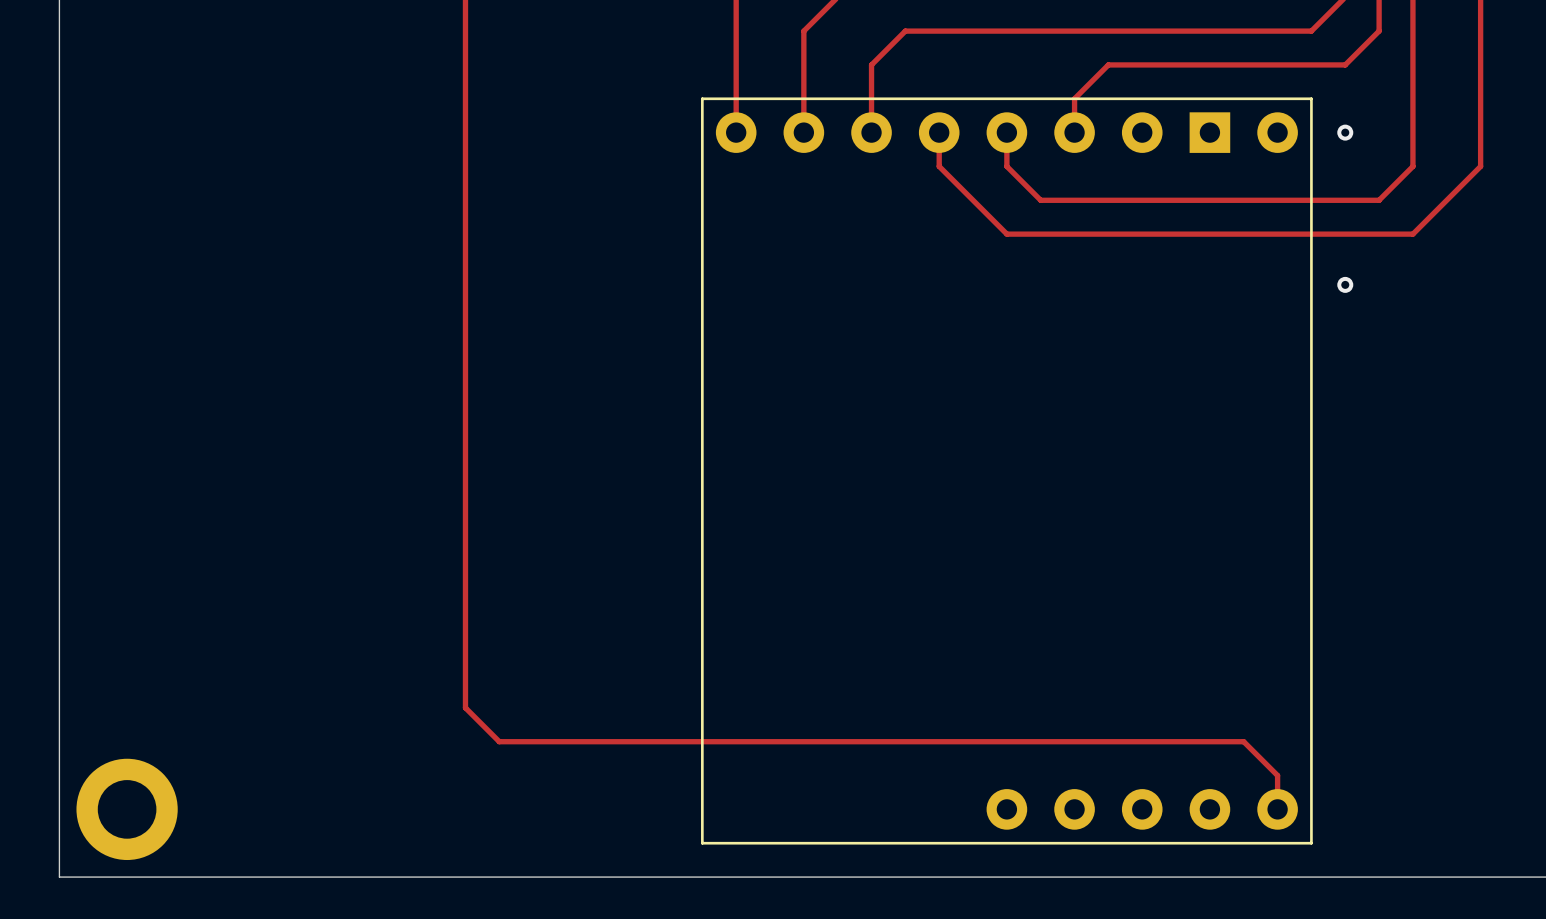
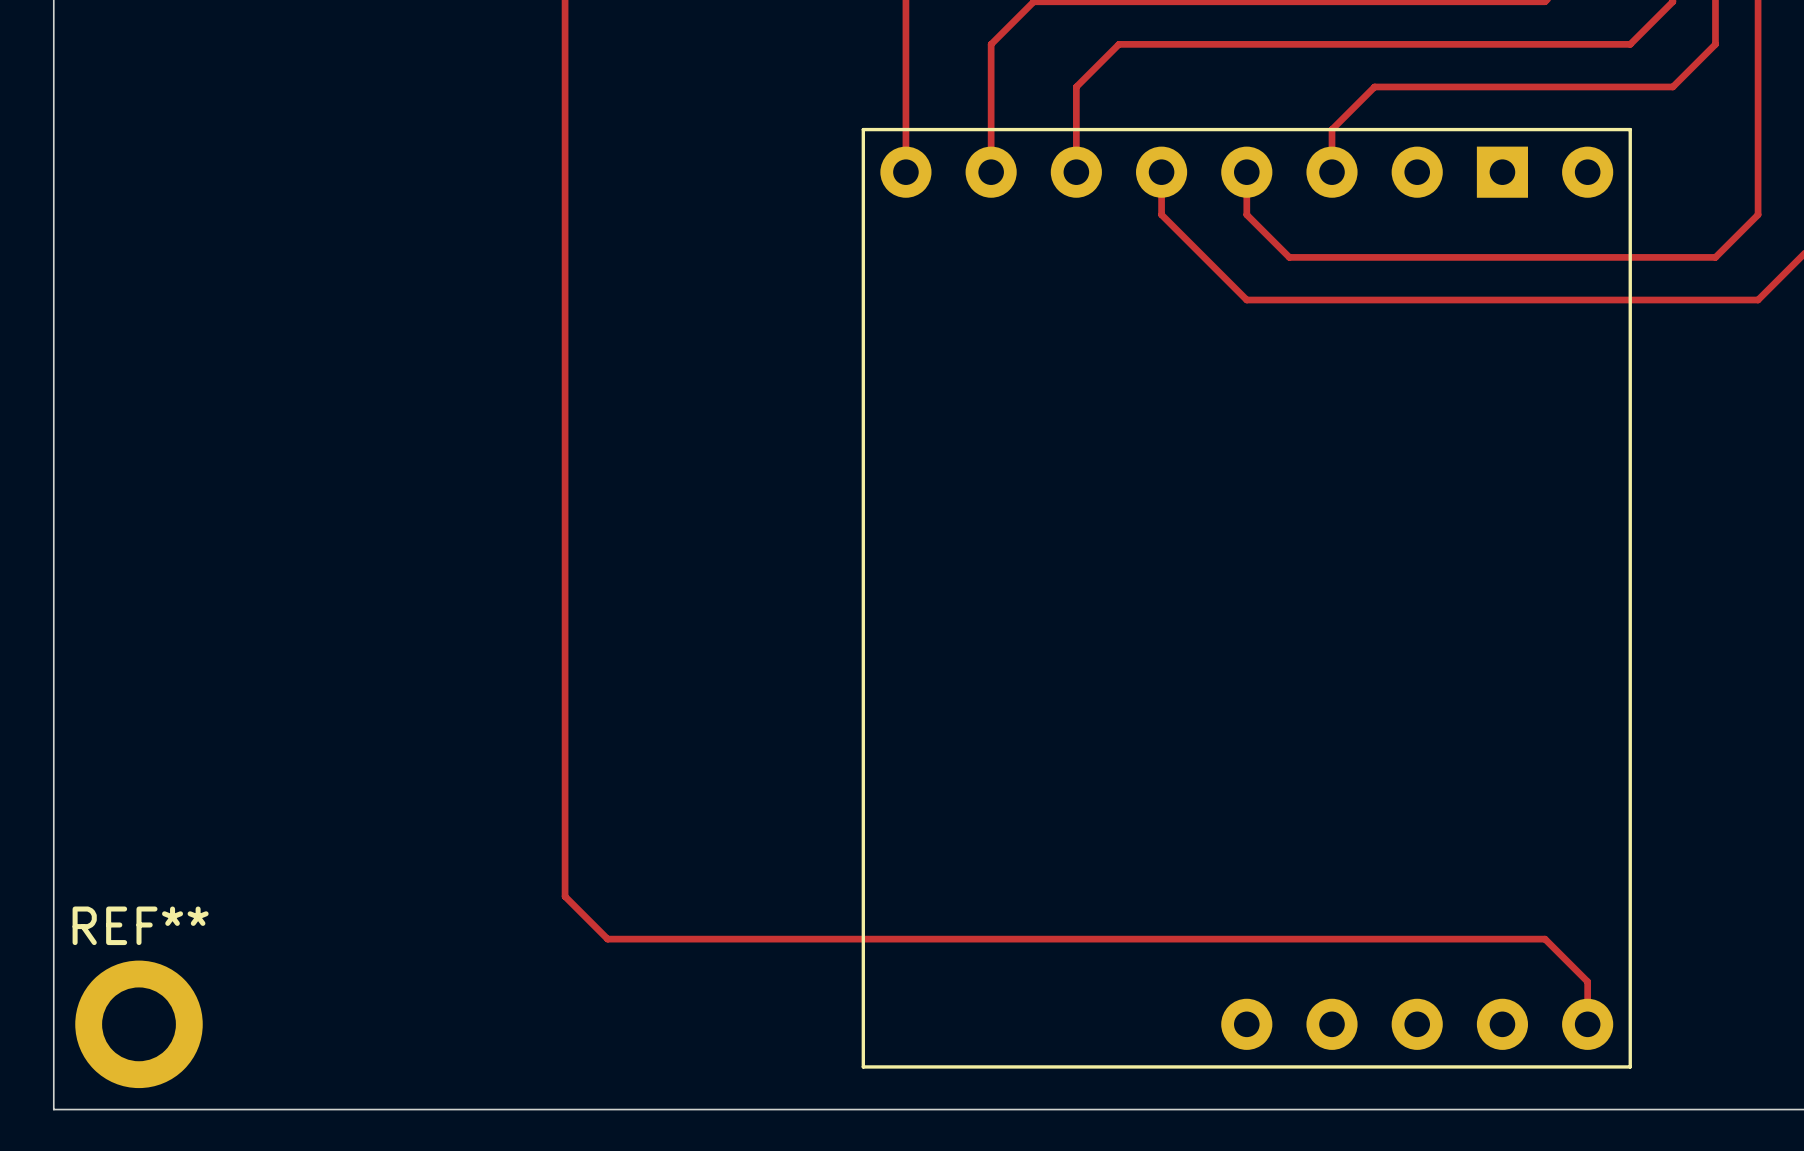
via: (1345, 132) -> none
via: (1345, 284) -> none
REF** name: none -> REF** (140, 925)

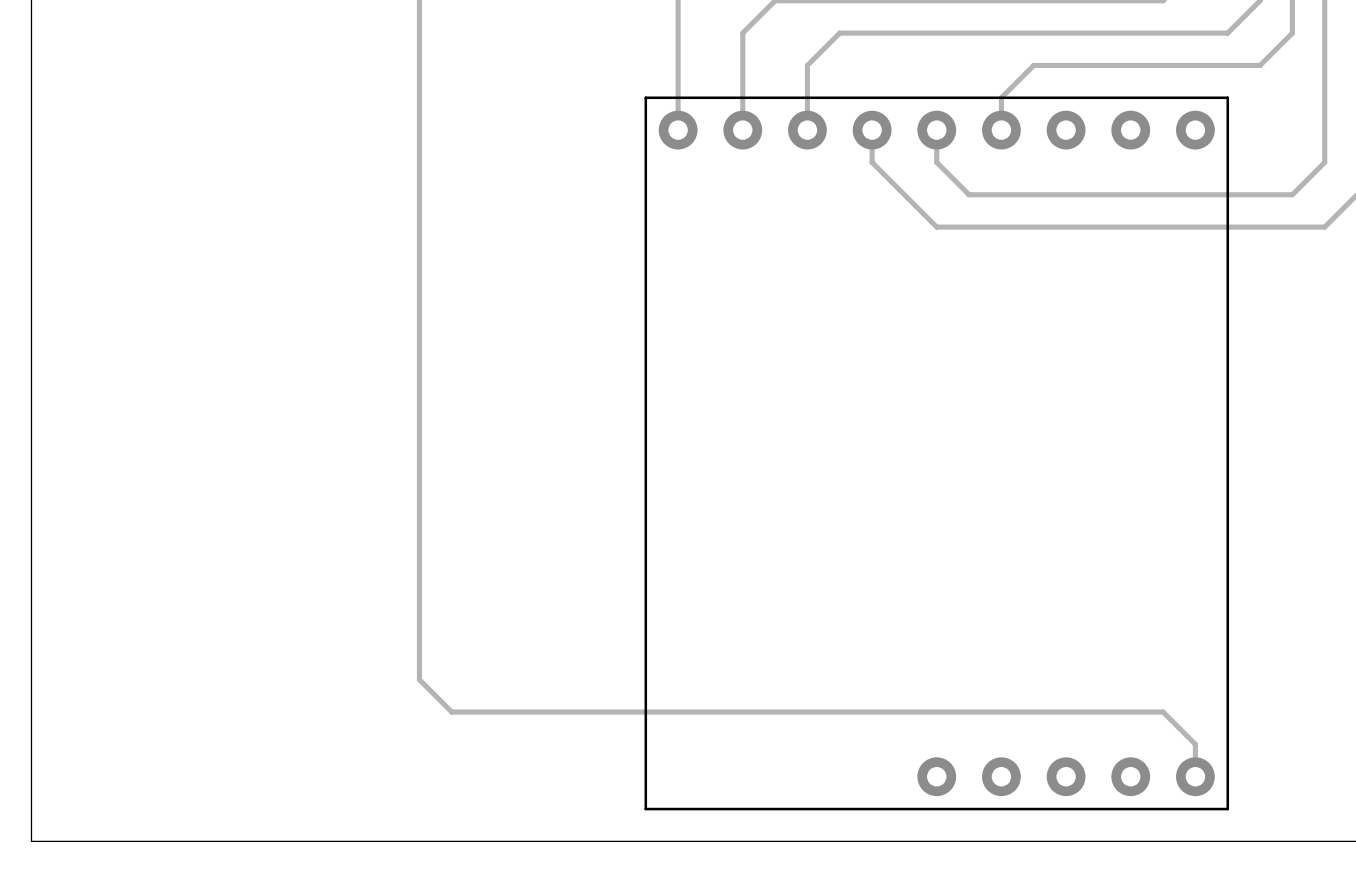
part footprint: [861, 127, 1632, 1069] -> [644, 96, 1230, 811]
REF**: (139, 1024) -> none

